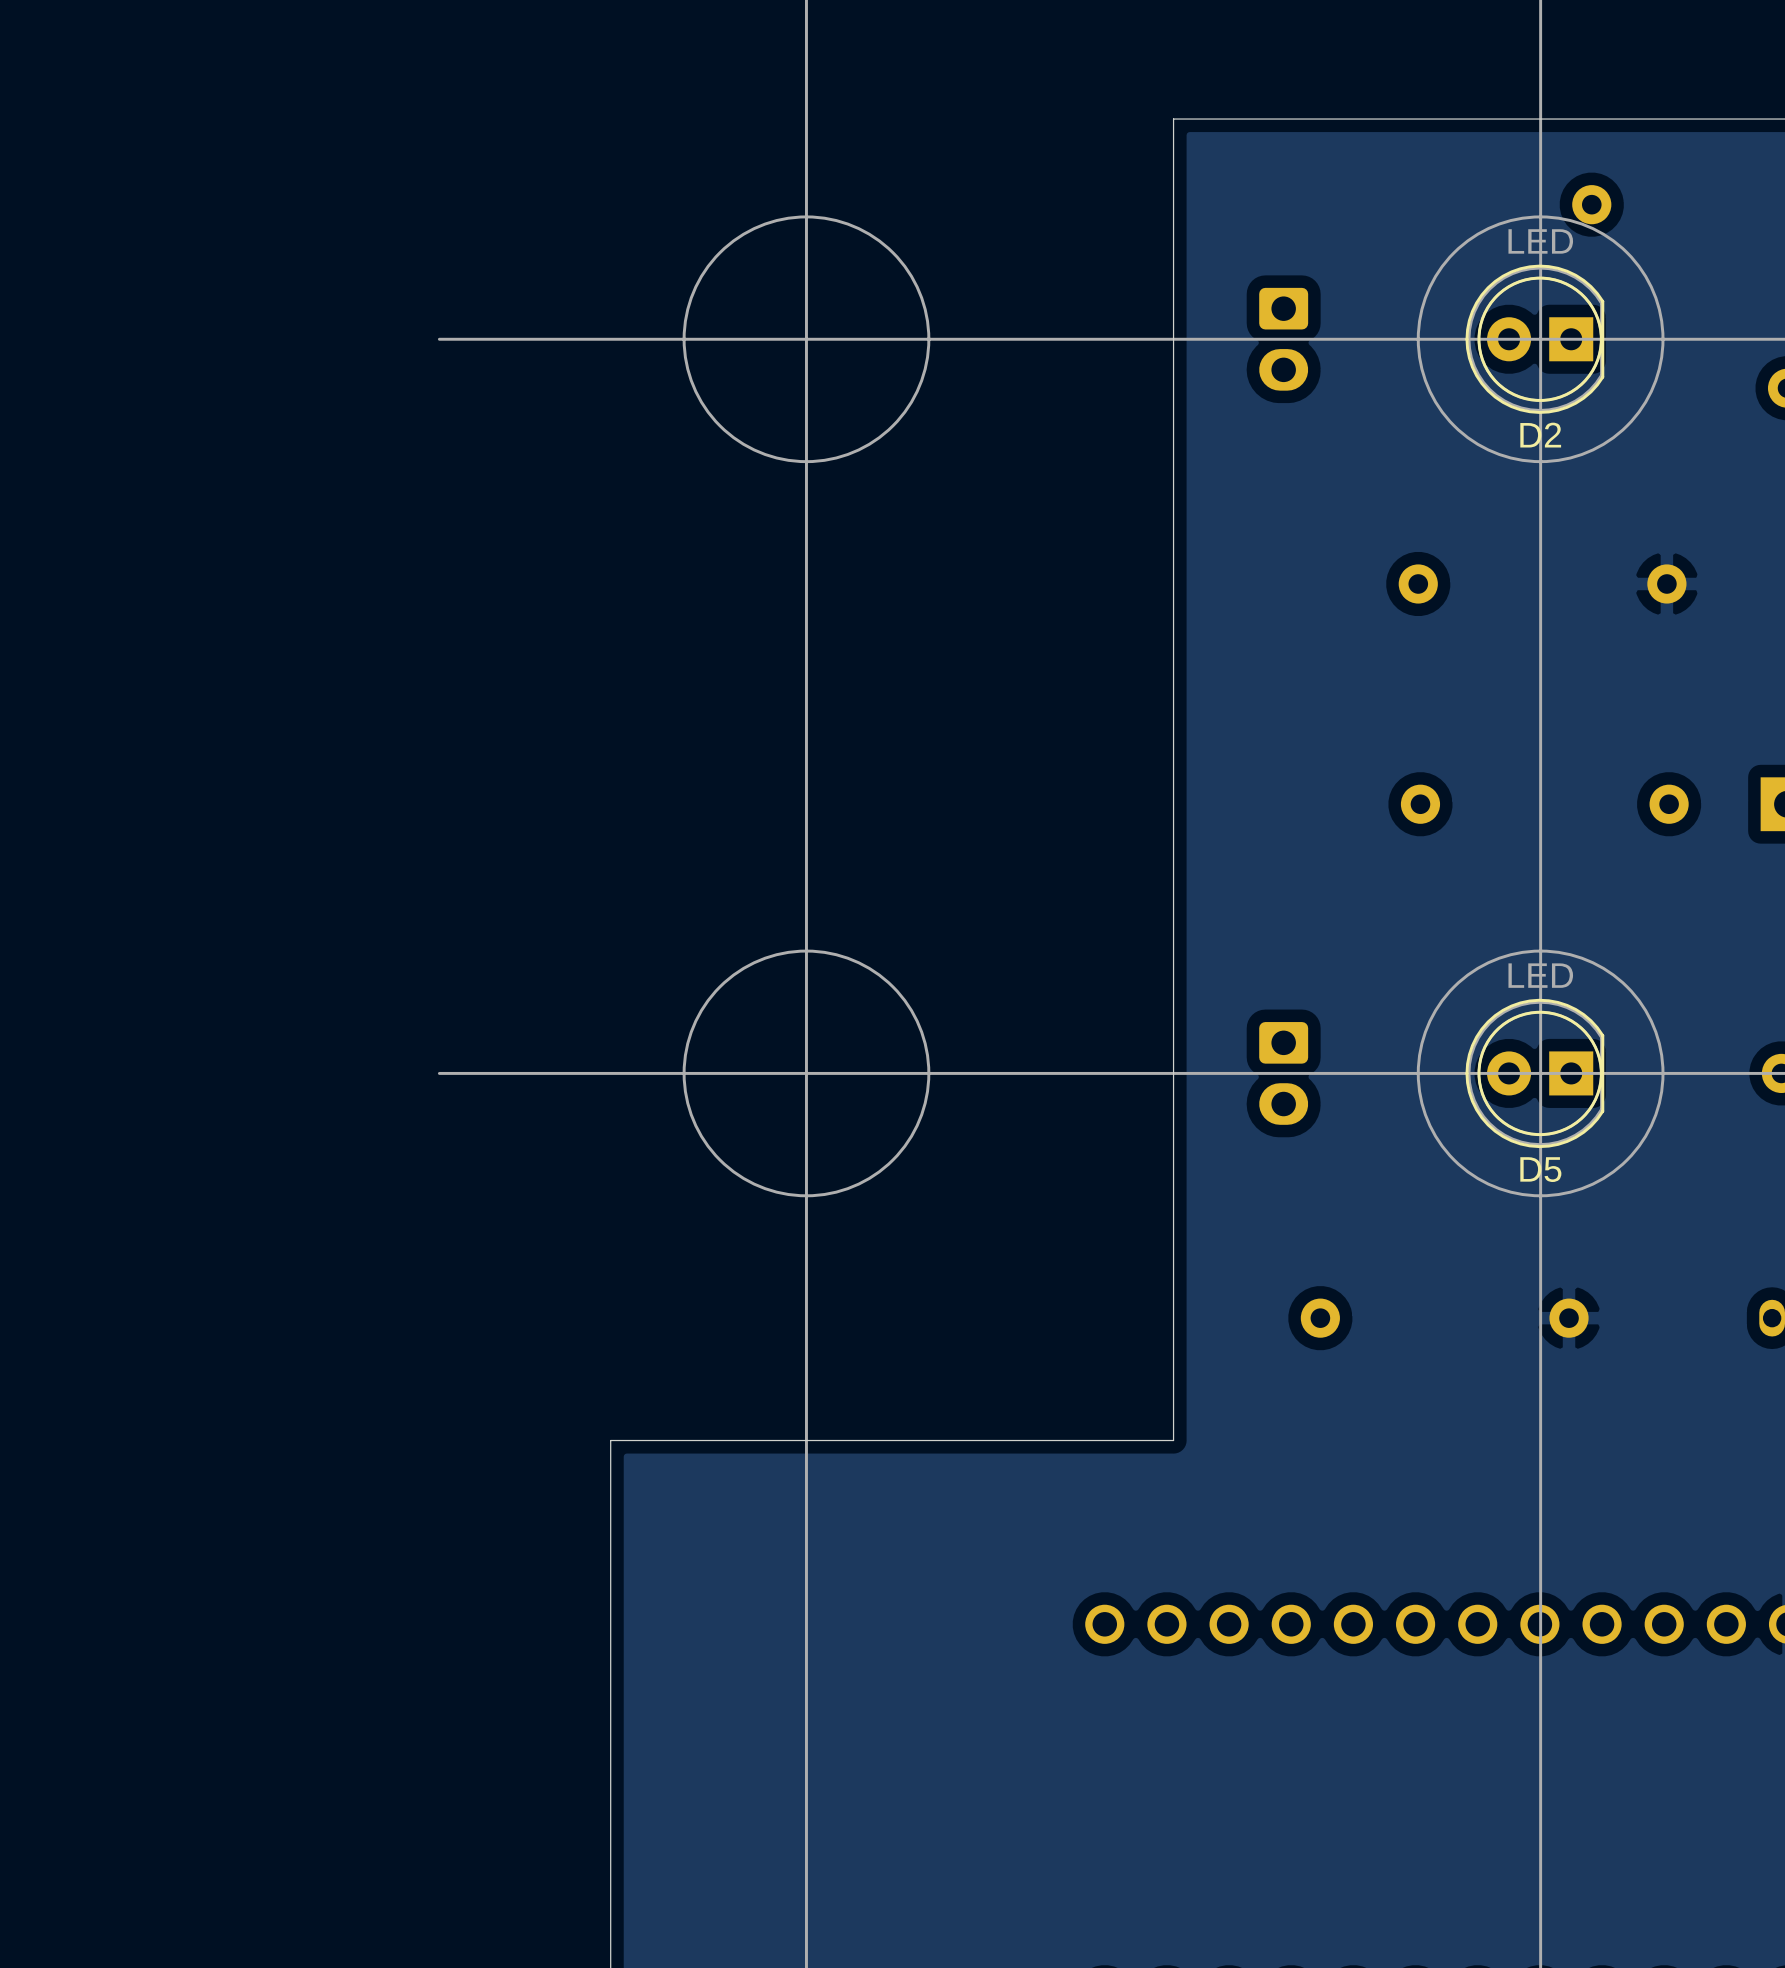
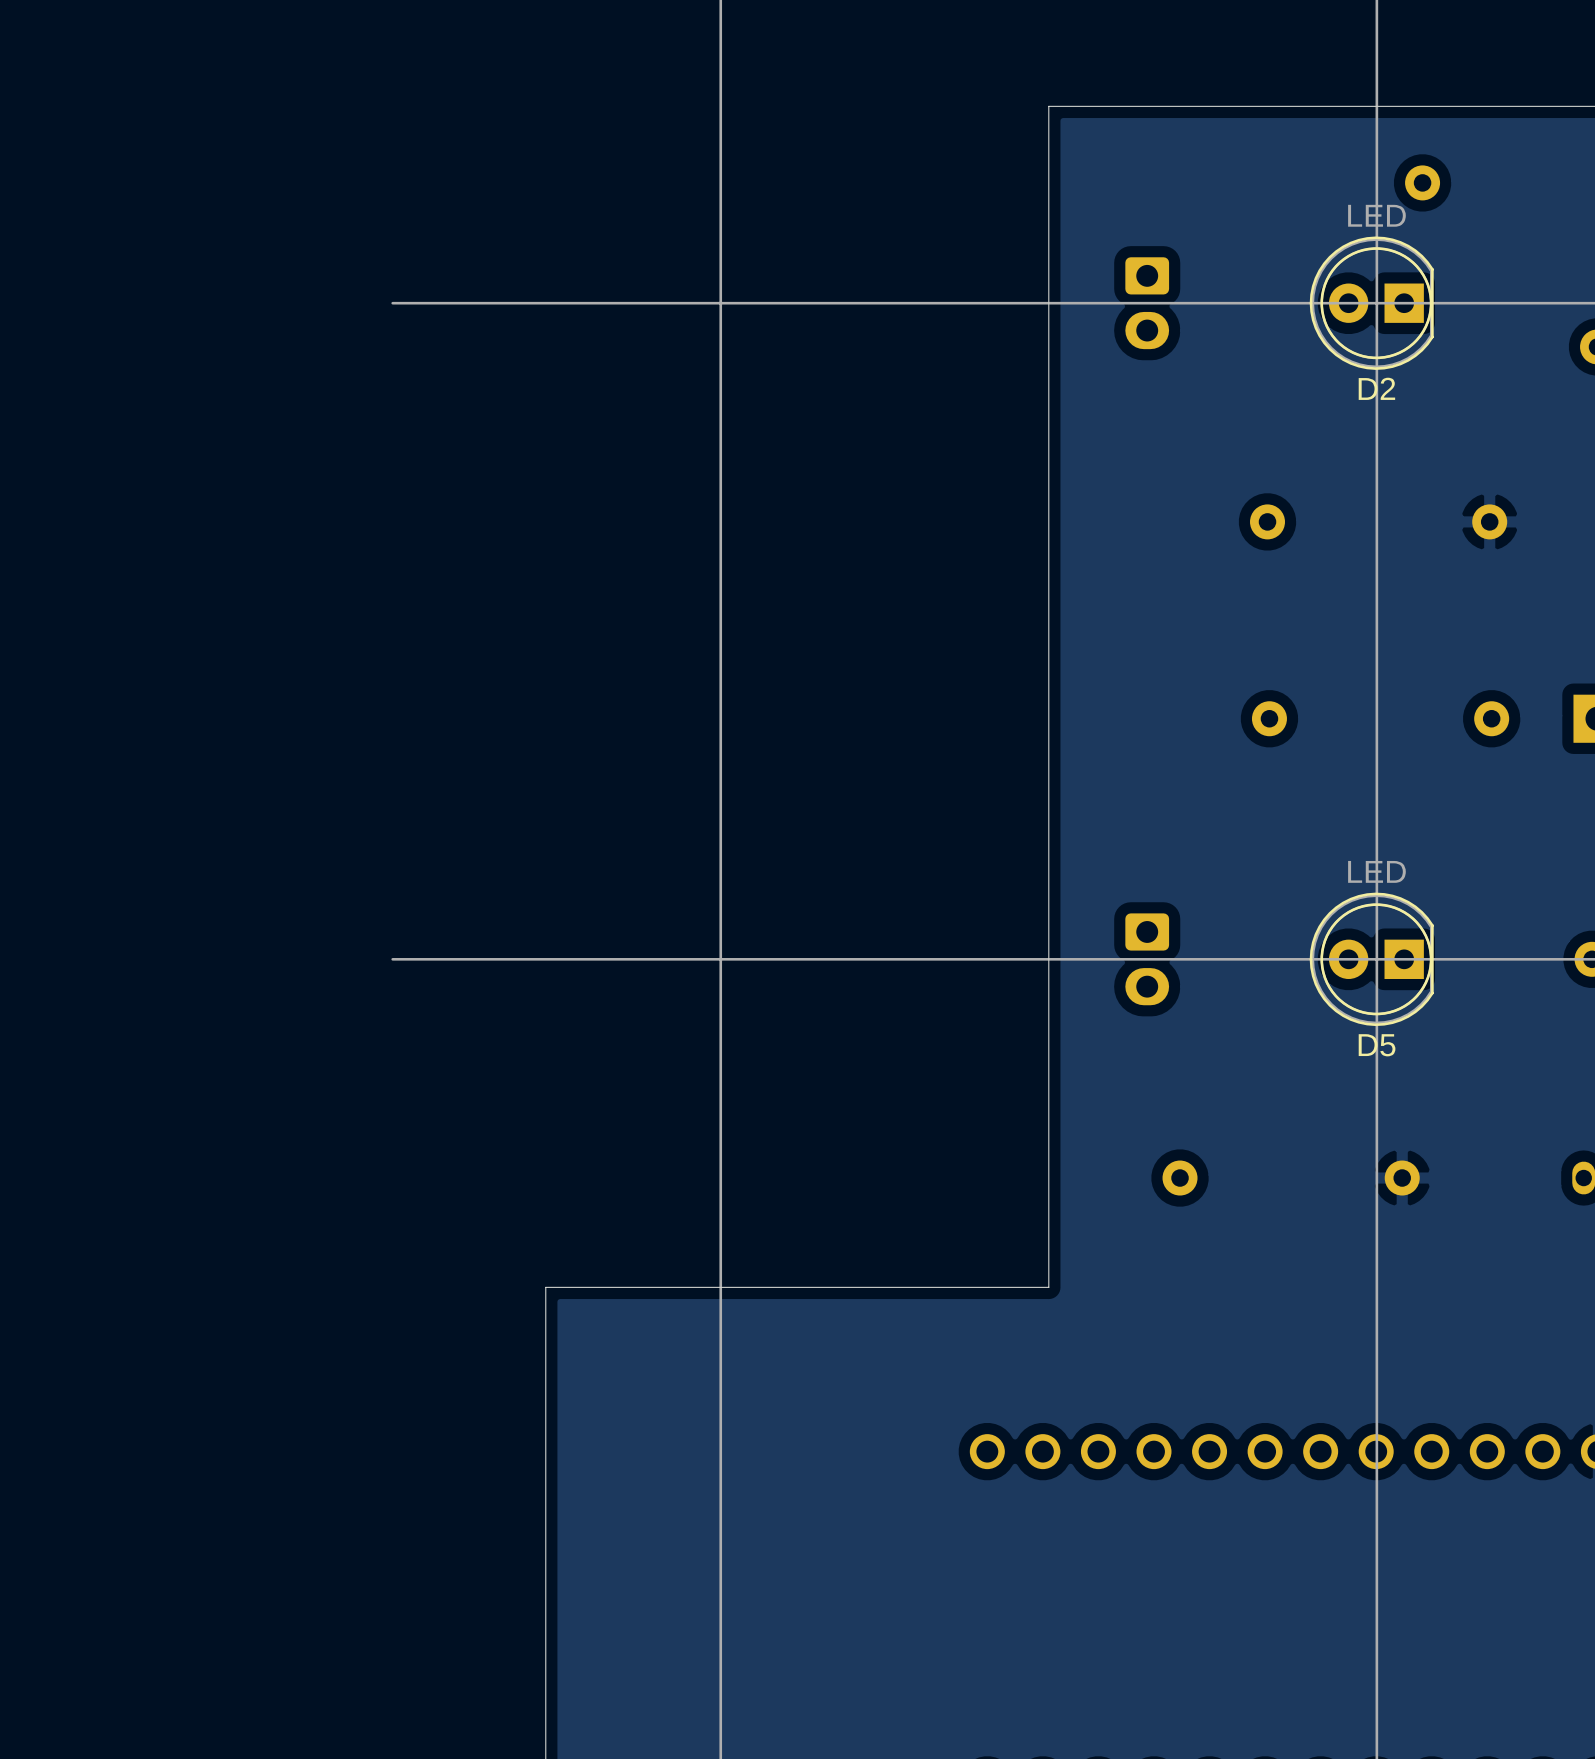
drawing: [682, 215, 931, 464] -> none
drawing: [1416, 215, 1665, 464] -> none
drawing: [682, 949, 931, 1198] -> none
drawing: [1416, 949, 1665, 1198] -> none

